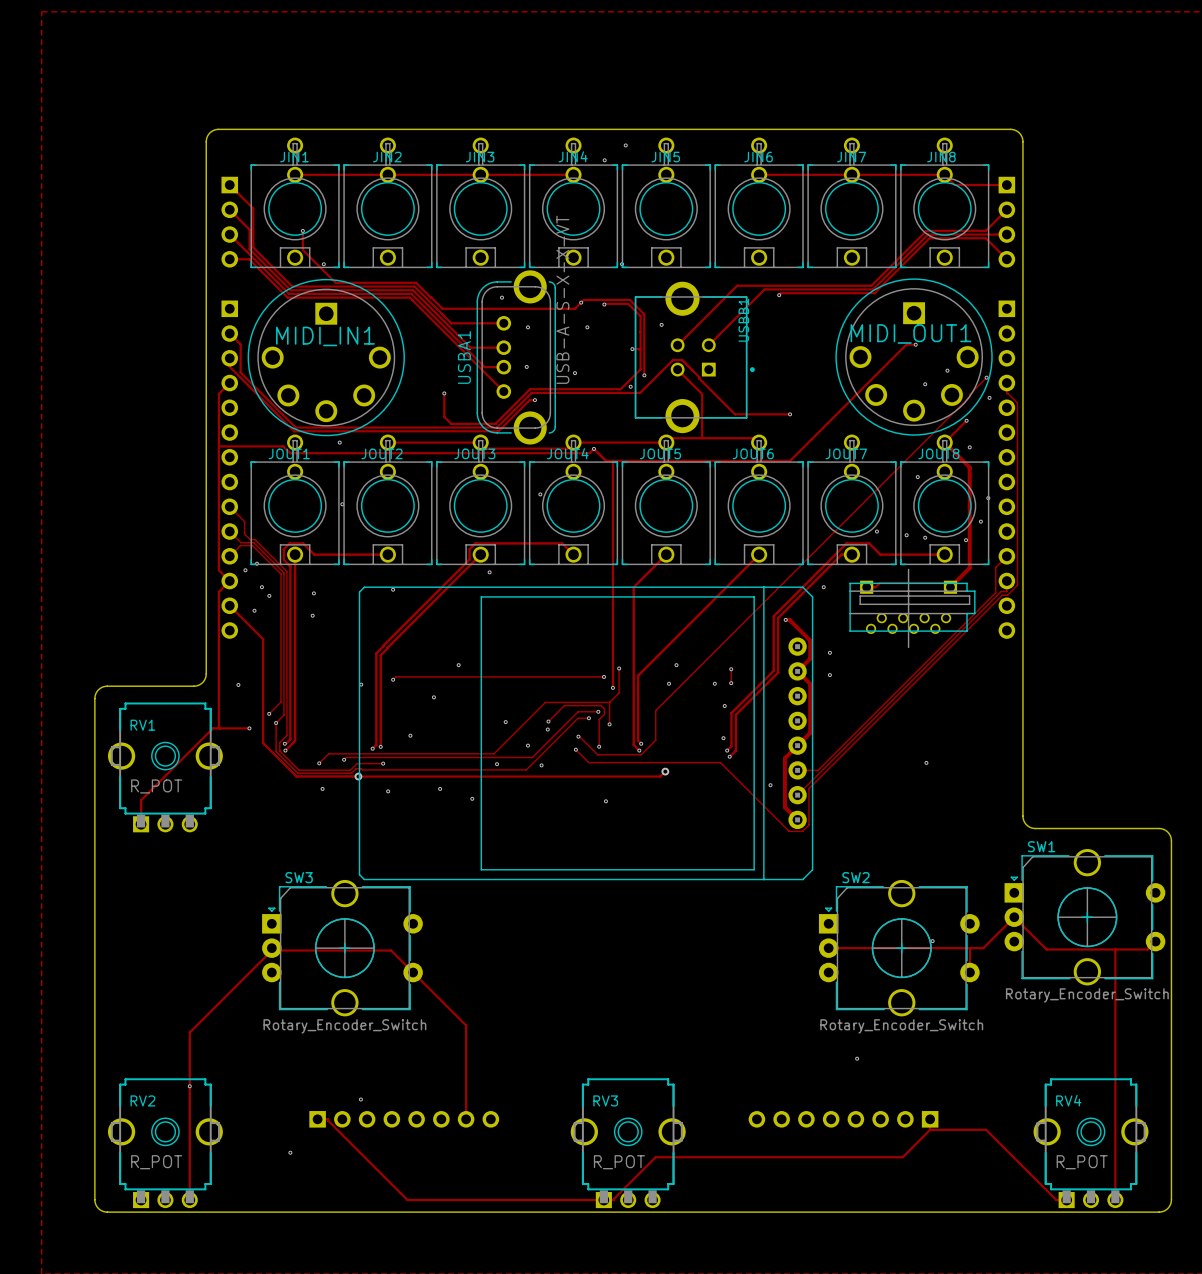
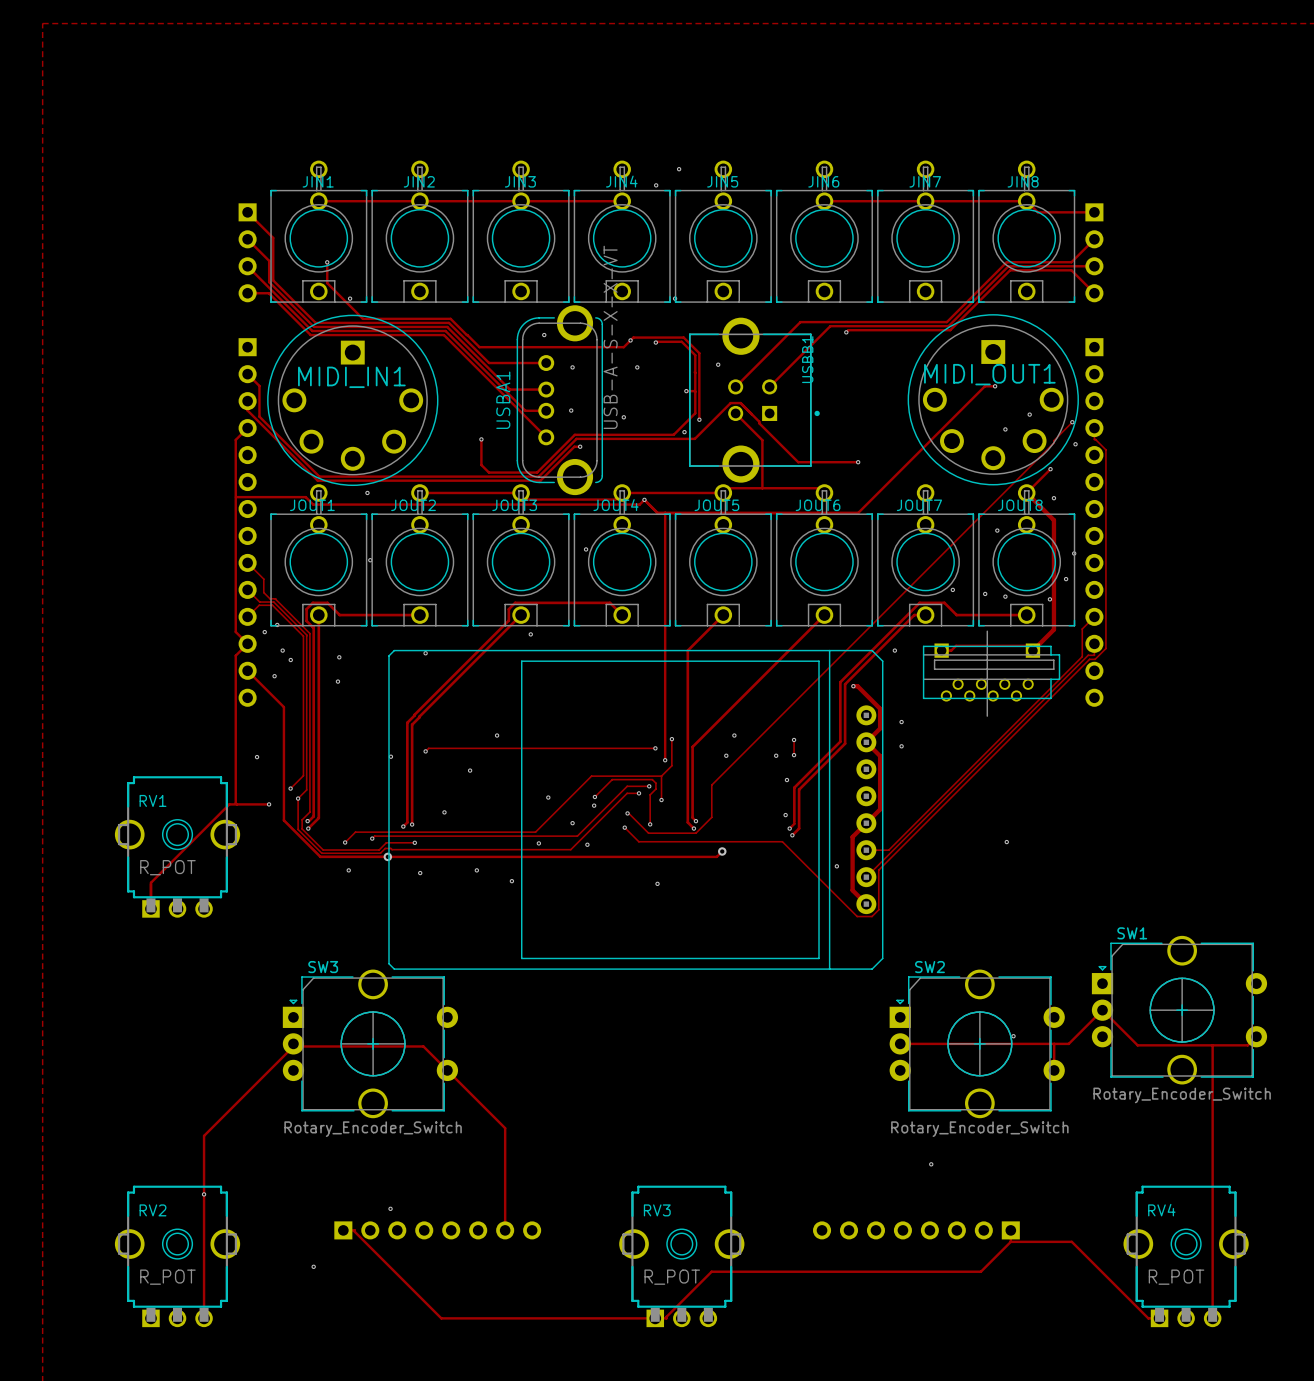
board edge: (1035, 828) (1159, 828) -> none
board edge: (1035, 828) (1026, 824) (1022, 816) (1022, 141) (1018, 131) (1010, 129) (213, 130) (207, 135) (206, 141) (205, 677) (201, 683) (195, 686) (105, 686) (98, 689) (94, 696) (94, 1199) (98, 1208) (107, 1212) -> none
board edge: (1159, 828) (1167, 832) (1171, 840) (1171, 1199) (1169, 1205) (1163, 1211) (107, 1212) -> none

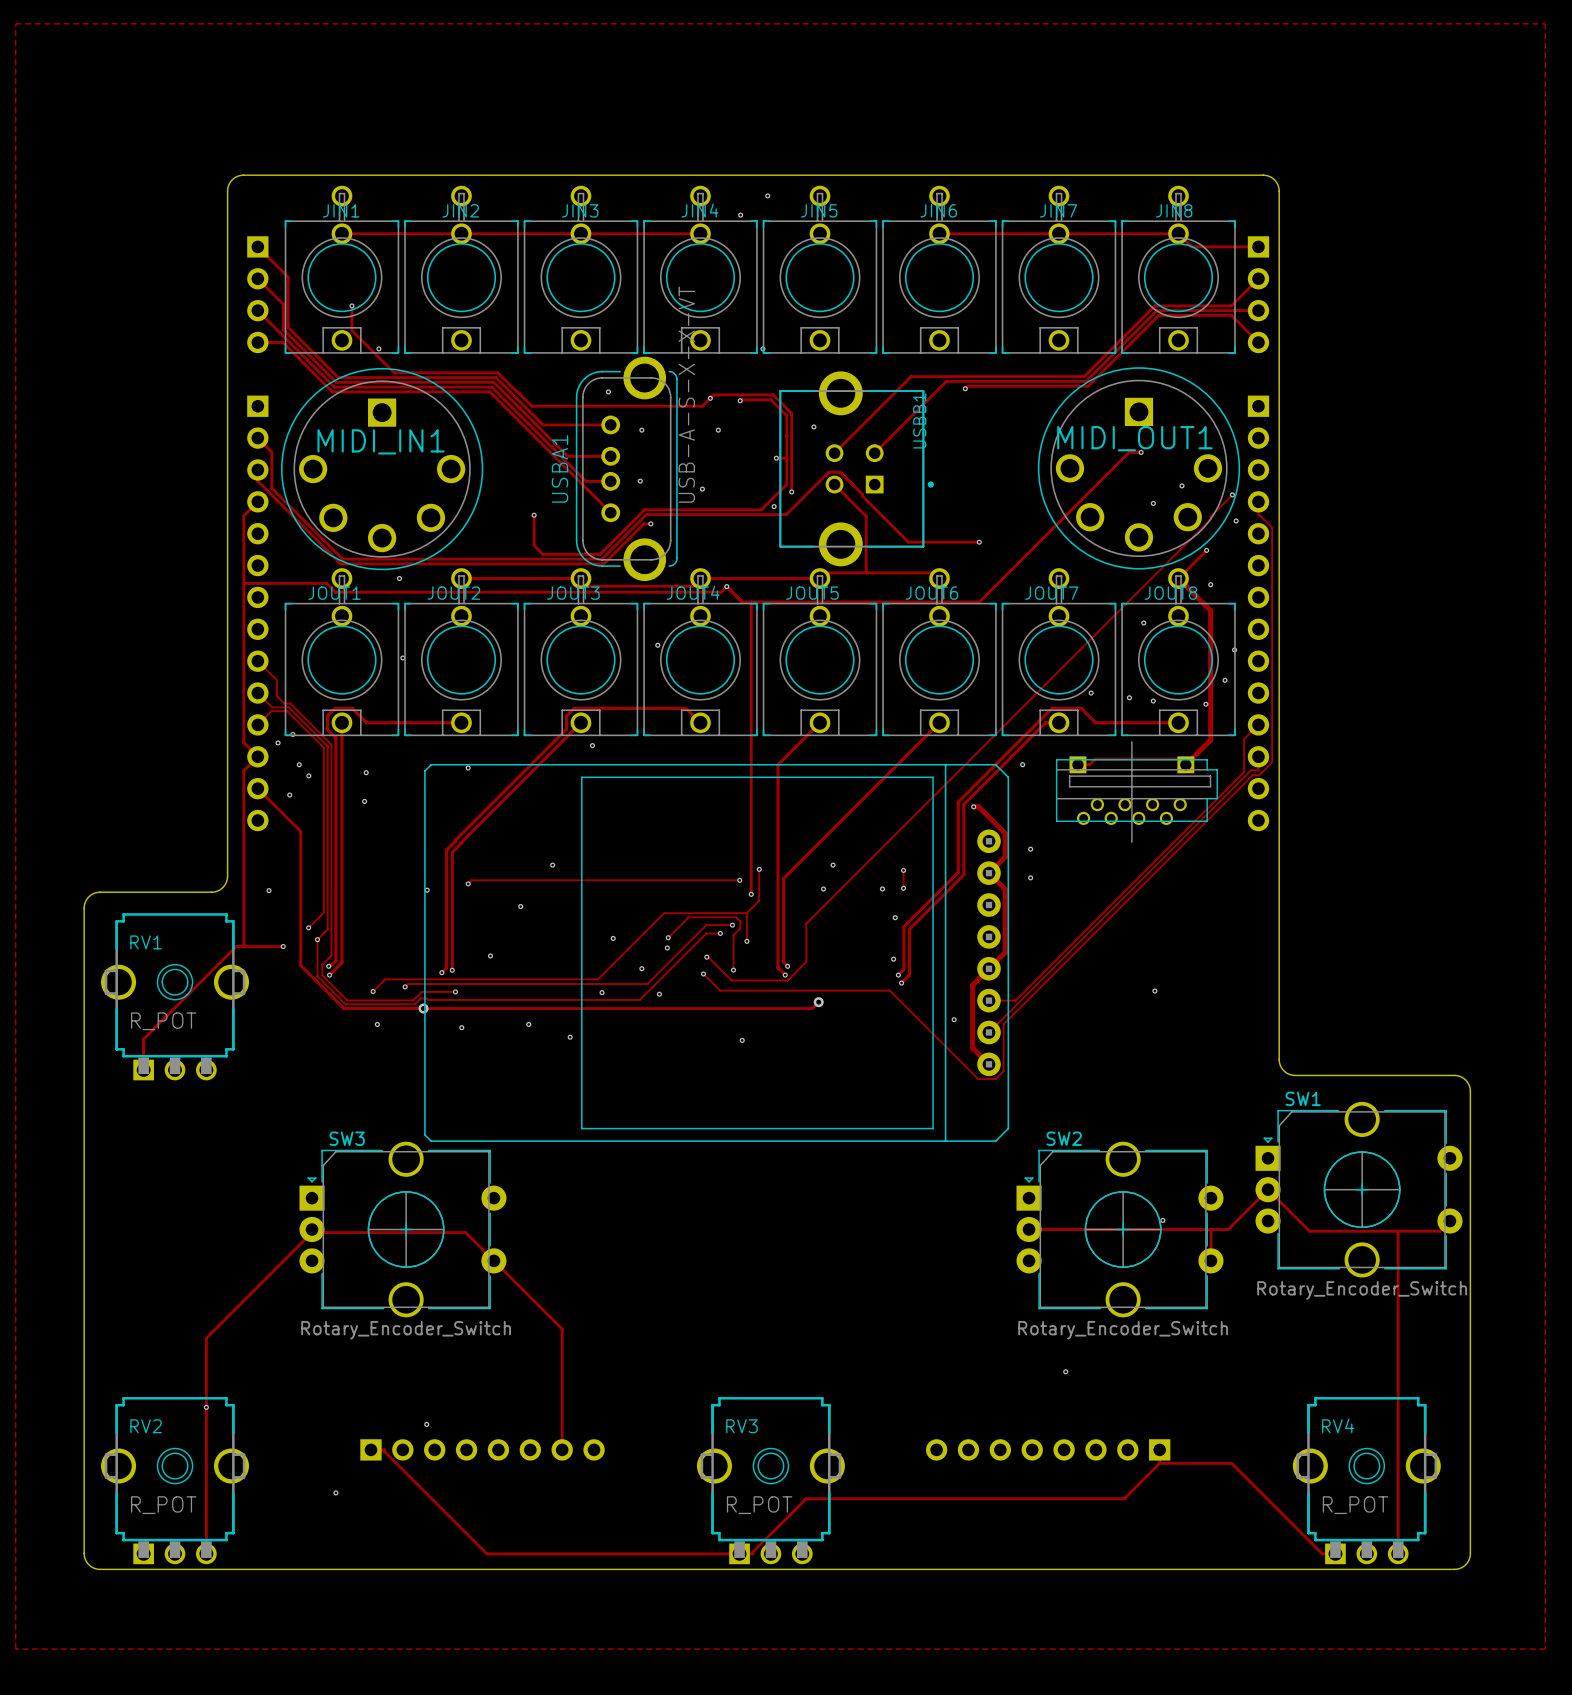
board edge: none -> (1295, 1075) (1454, 1075)
board edge: none -> (1295, 1075) (1283, 1070) (1279, 1059) (1279, 191) (1277, 185) (1272, 178) (1263, 175) (237, 176) (229, 183) (227, 191) (227, 880) (221, 888) (213, 892) (98, 892) (88, 896) (84, 906) (84, 1553) (88, 1564) (100, 1569)
board edge: none -> (1454, 1075) (1465, 1080) (1470, 1091) (1470, 1553) (1468, 1561) (1460, 1568) (100, 1569)

